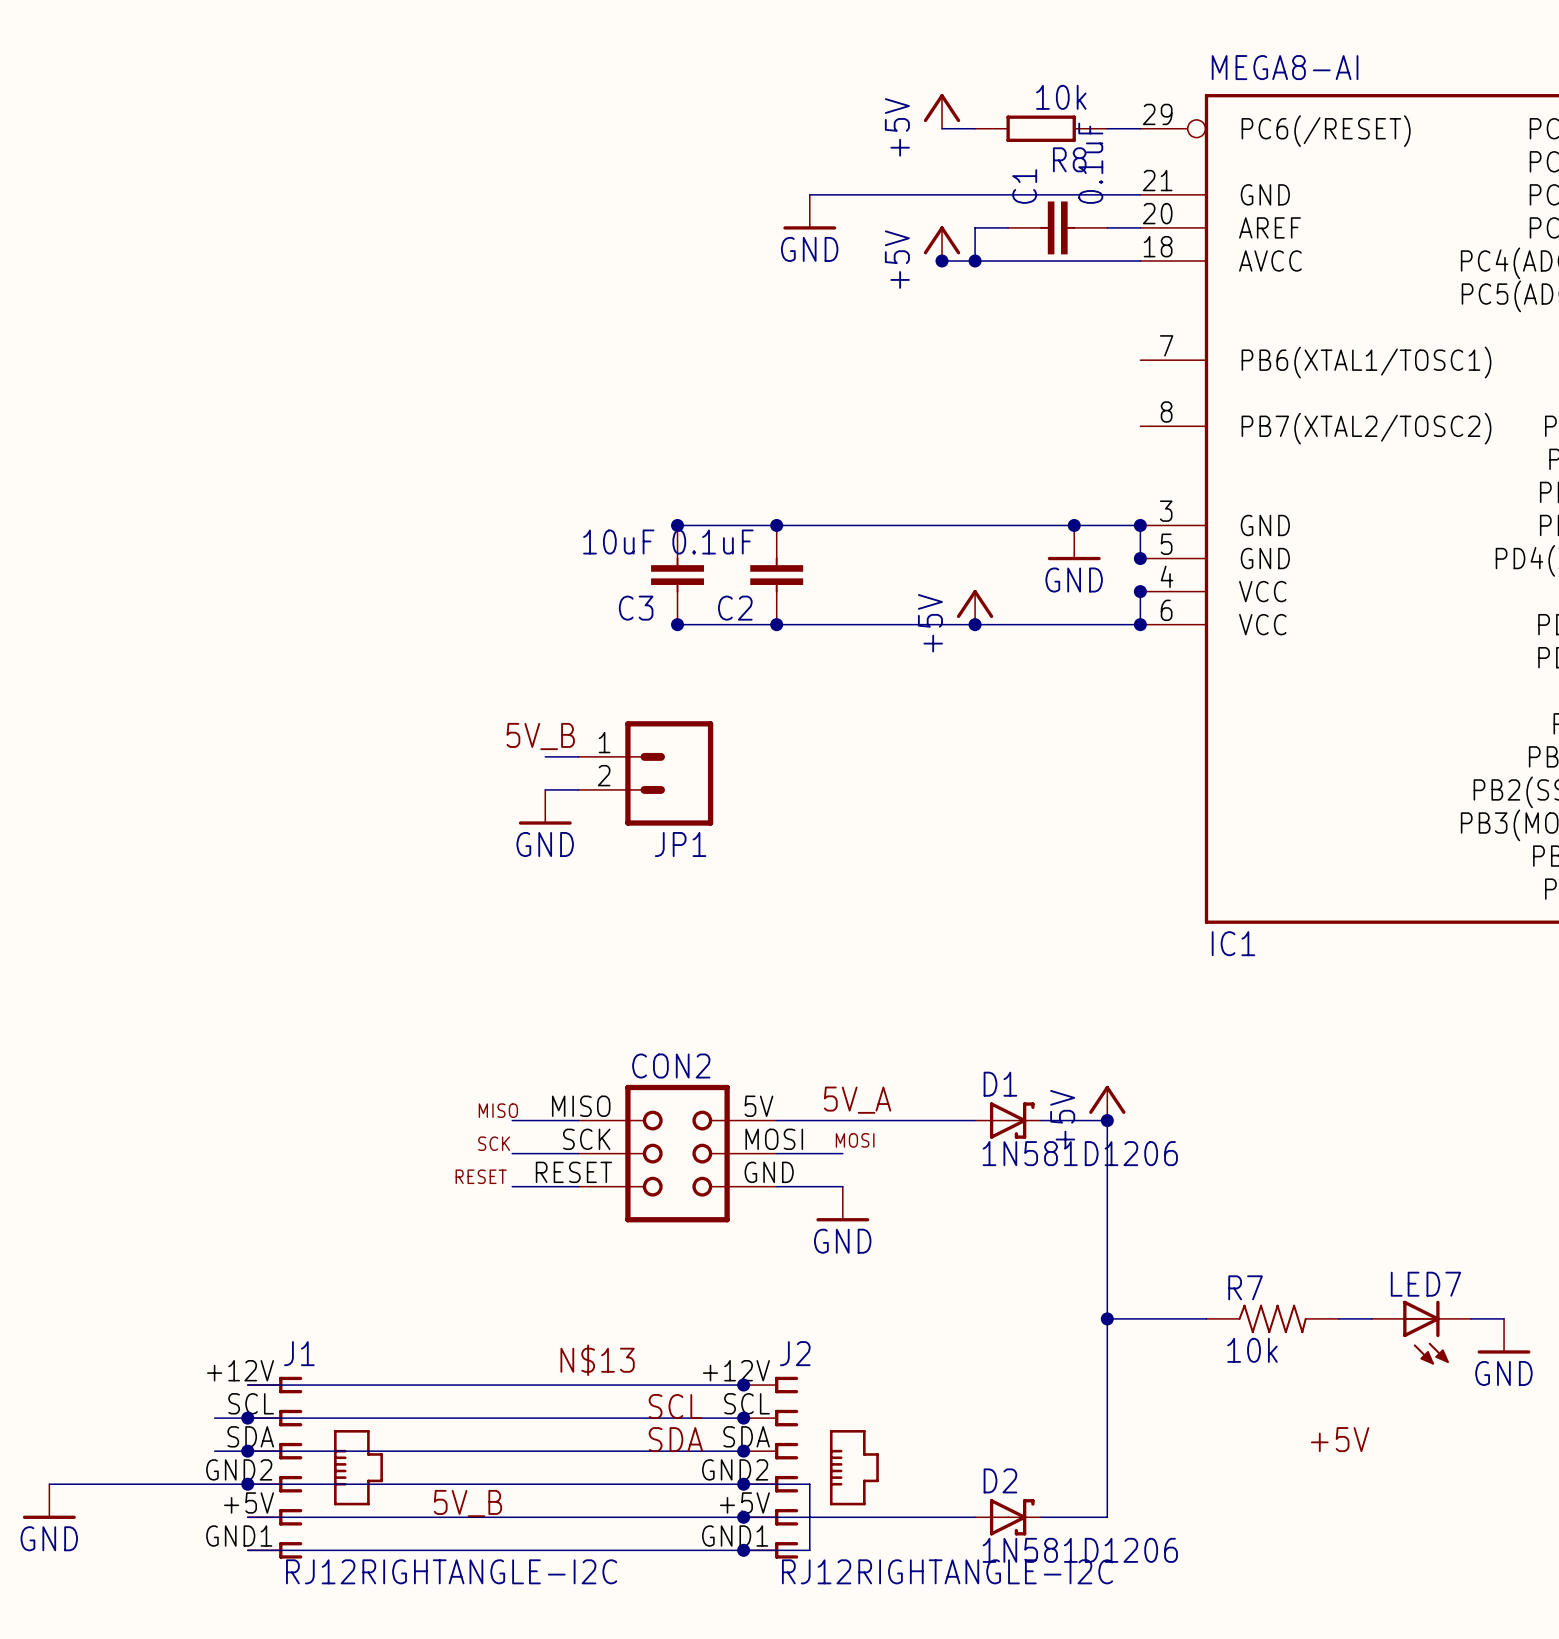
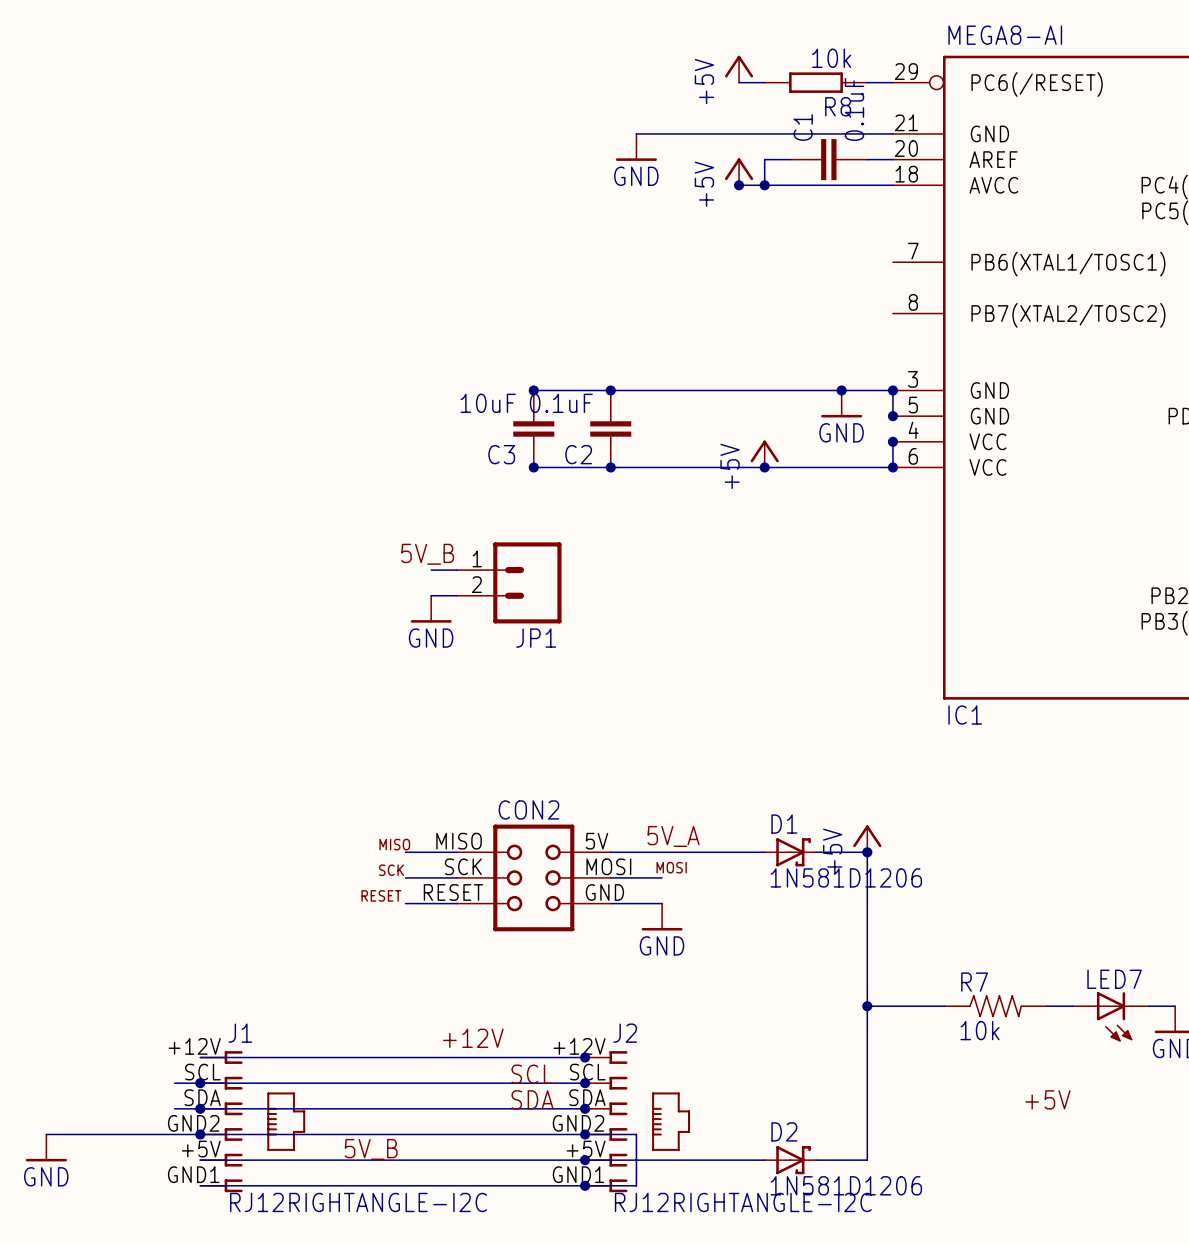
label: N$13 (597, 1360) -> +12V (473, 1038)

